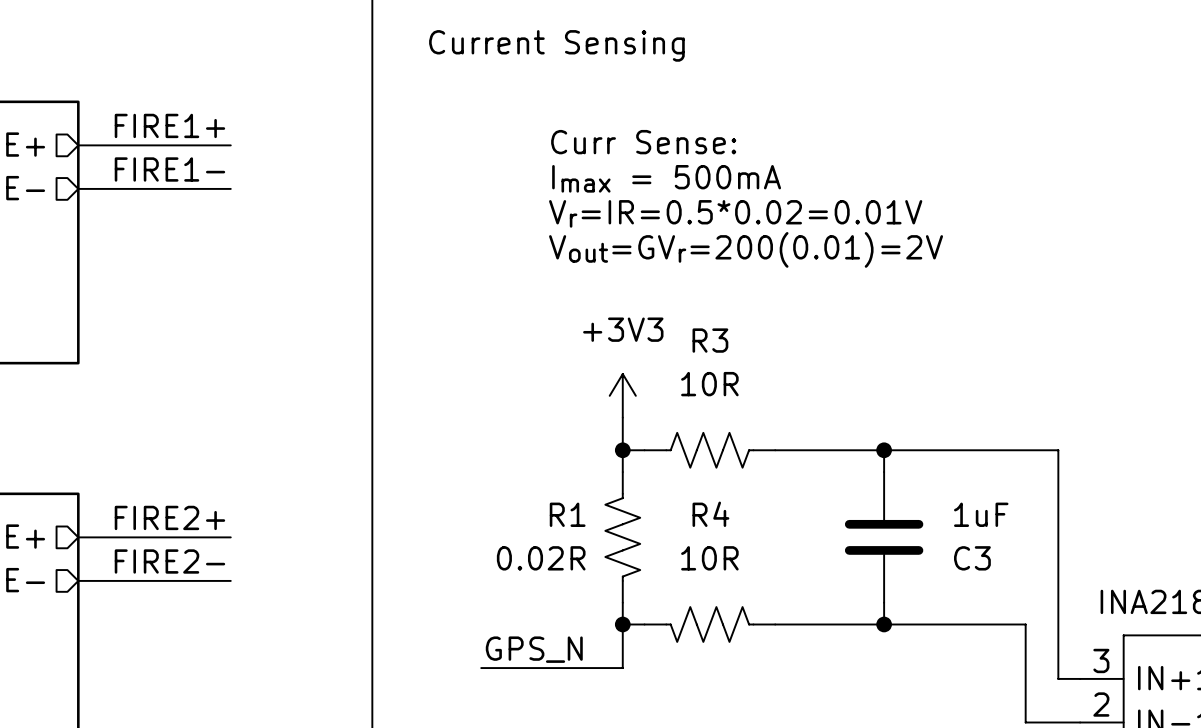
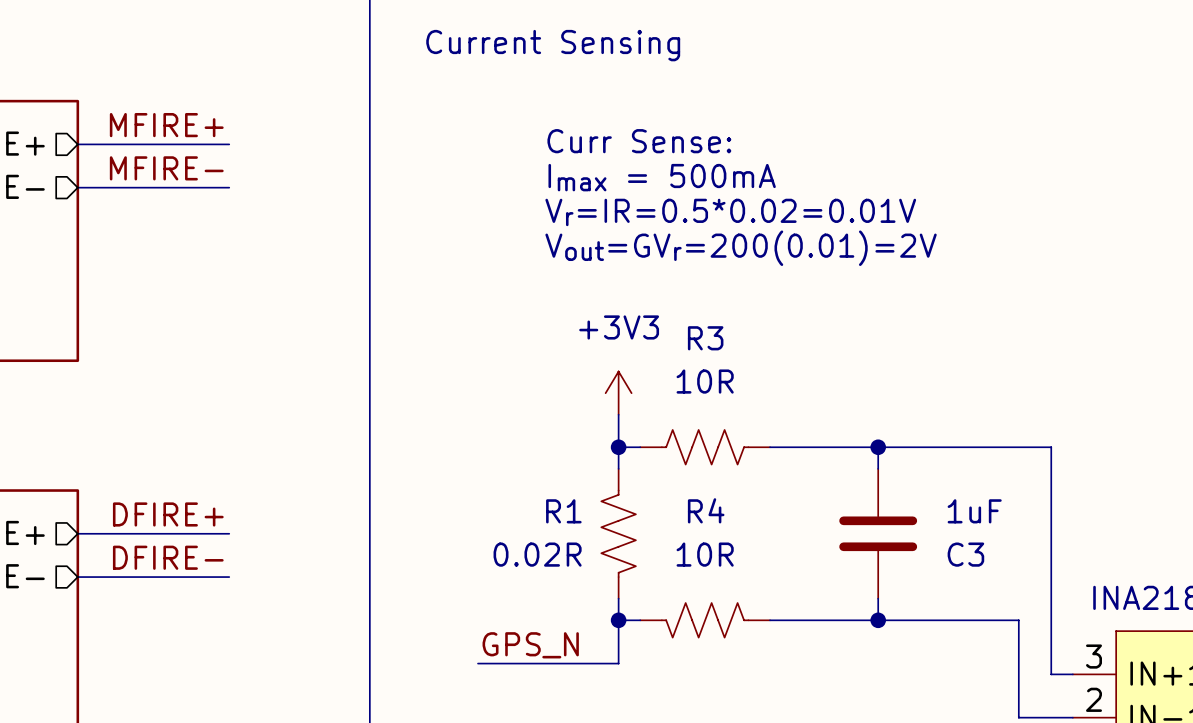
label: FIRE1+ (169, 125) -> MFIRE+ (166, 125)
label: FIRE1- (169, 169) -> MFIRE- (166, 168)
label: FIRE2+ (169, 517) -> DFIRE+ (168, 514)
label: FIRE2- (169, 561) -> DFIRE- (168, 557)

